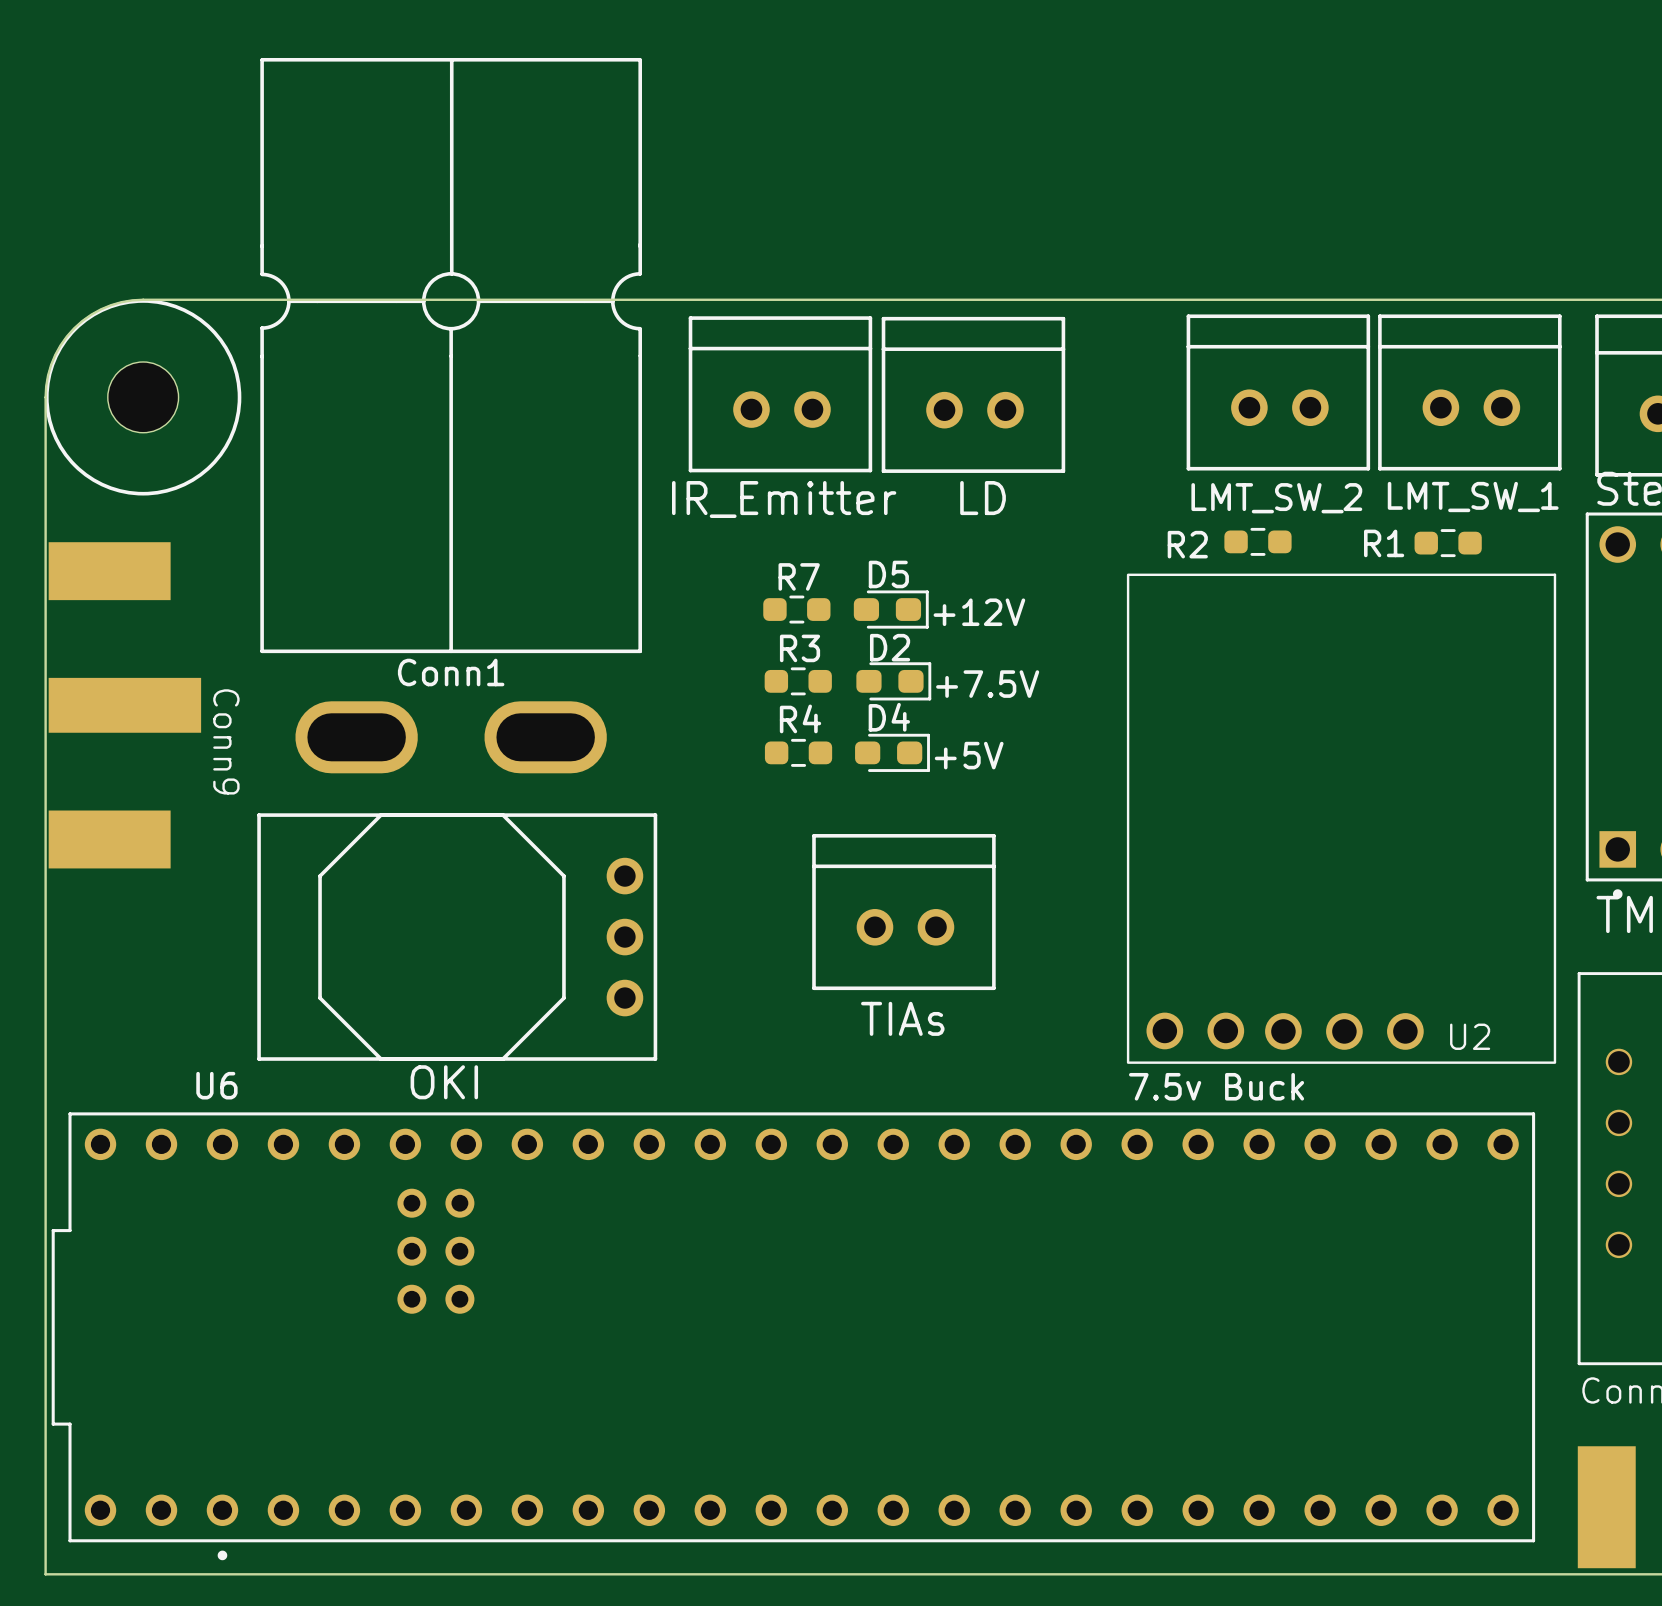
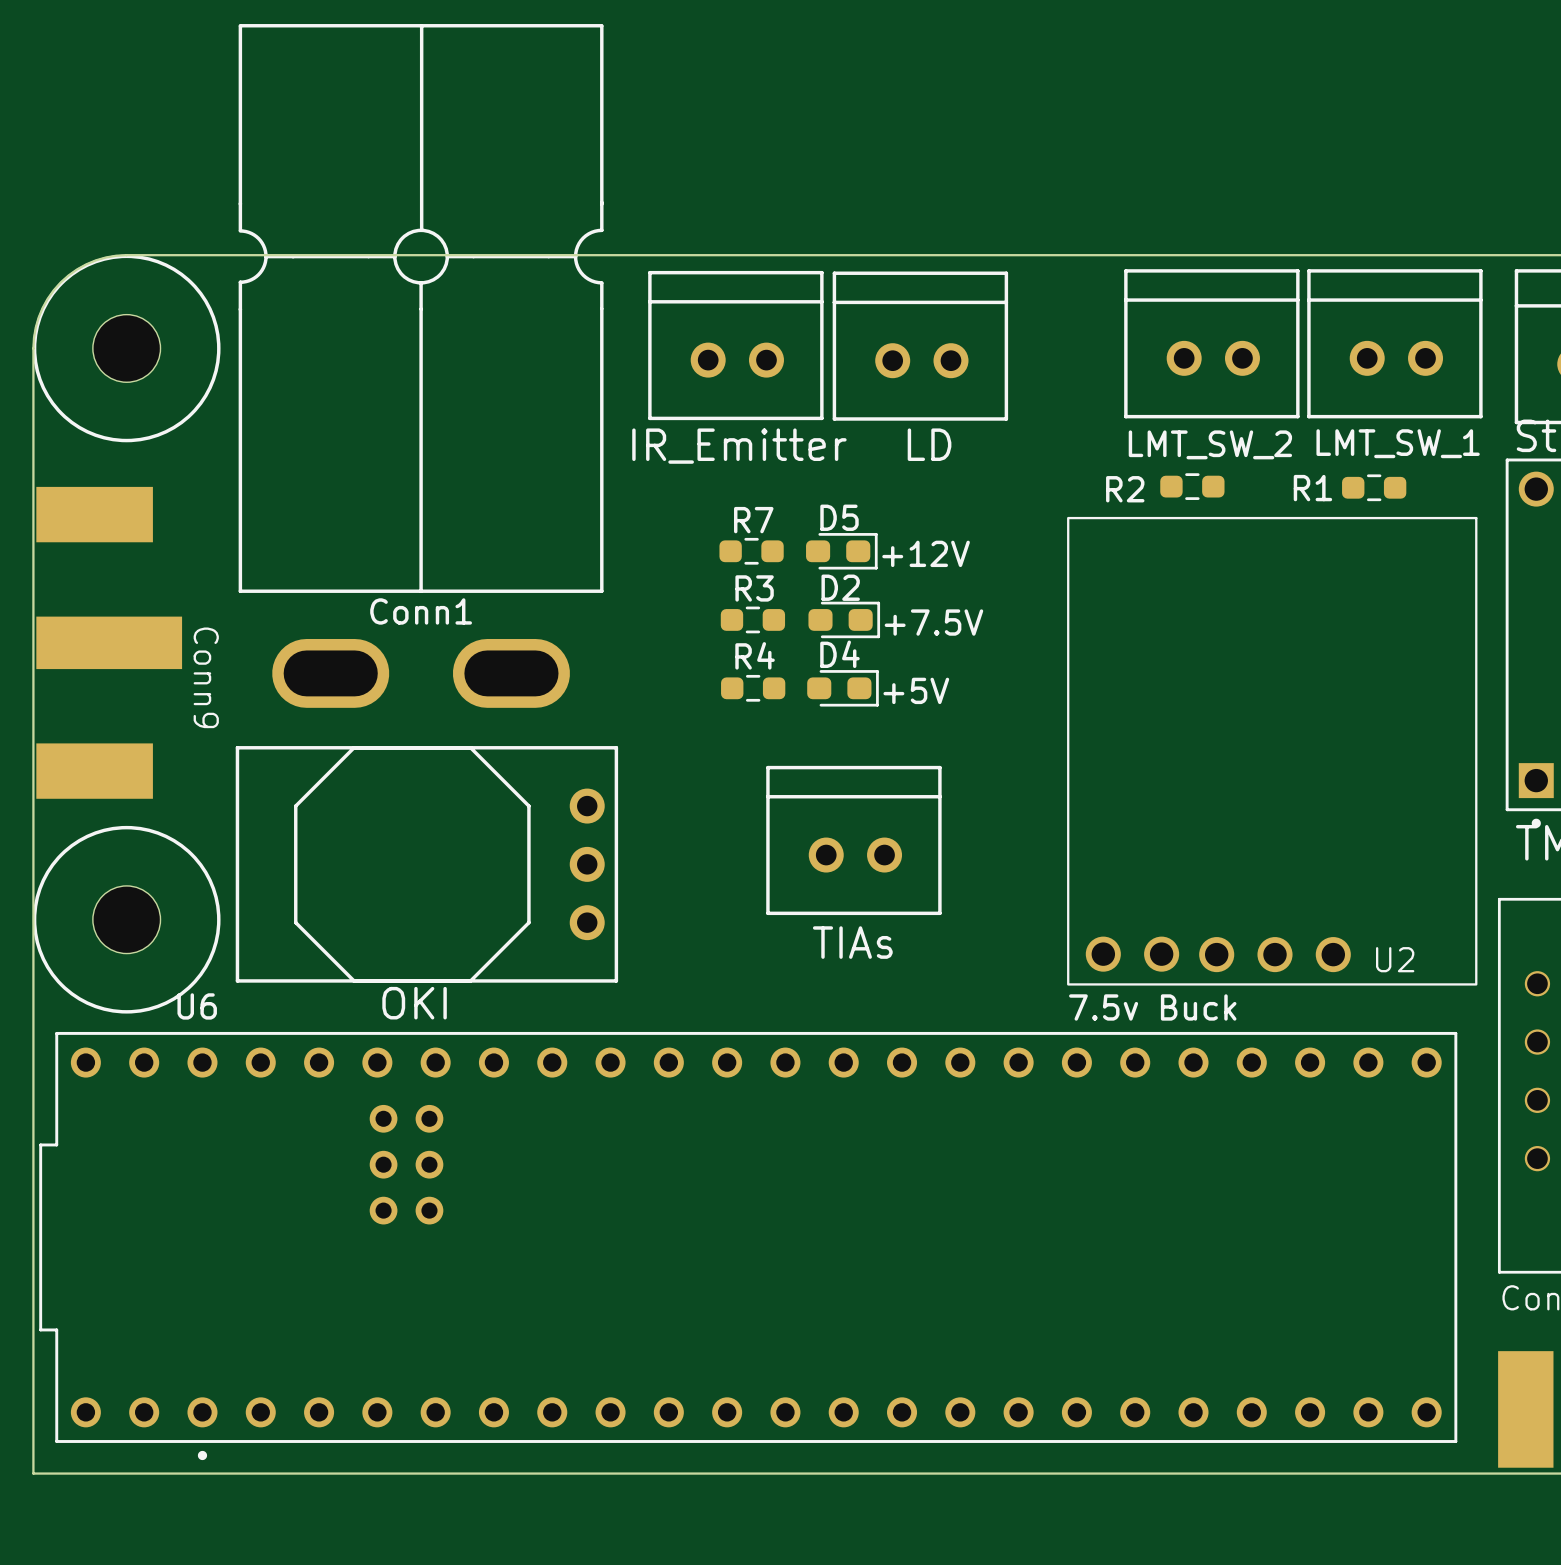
part: none -> (126, 919)

